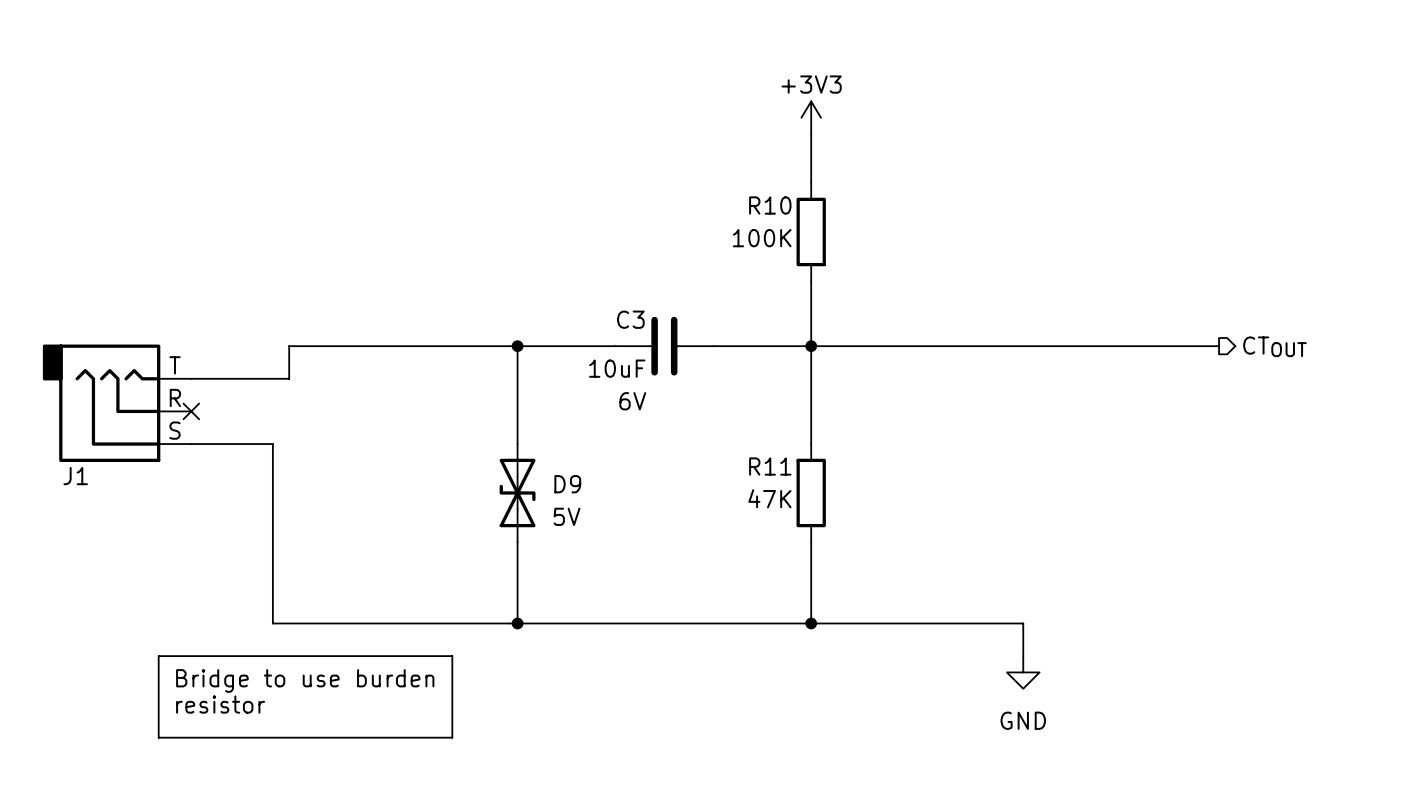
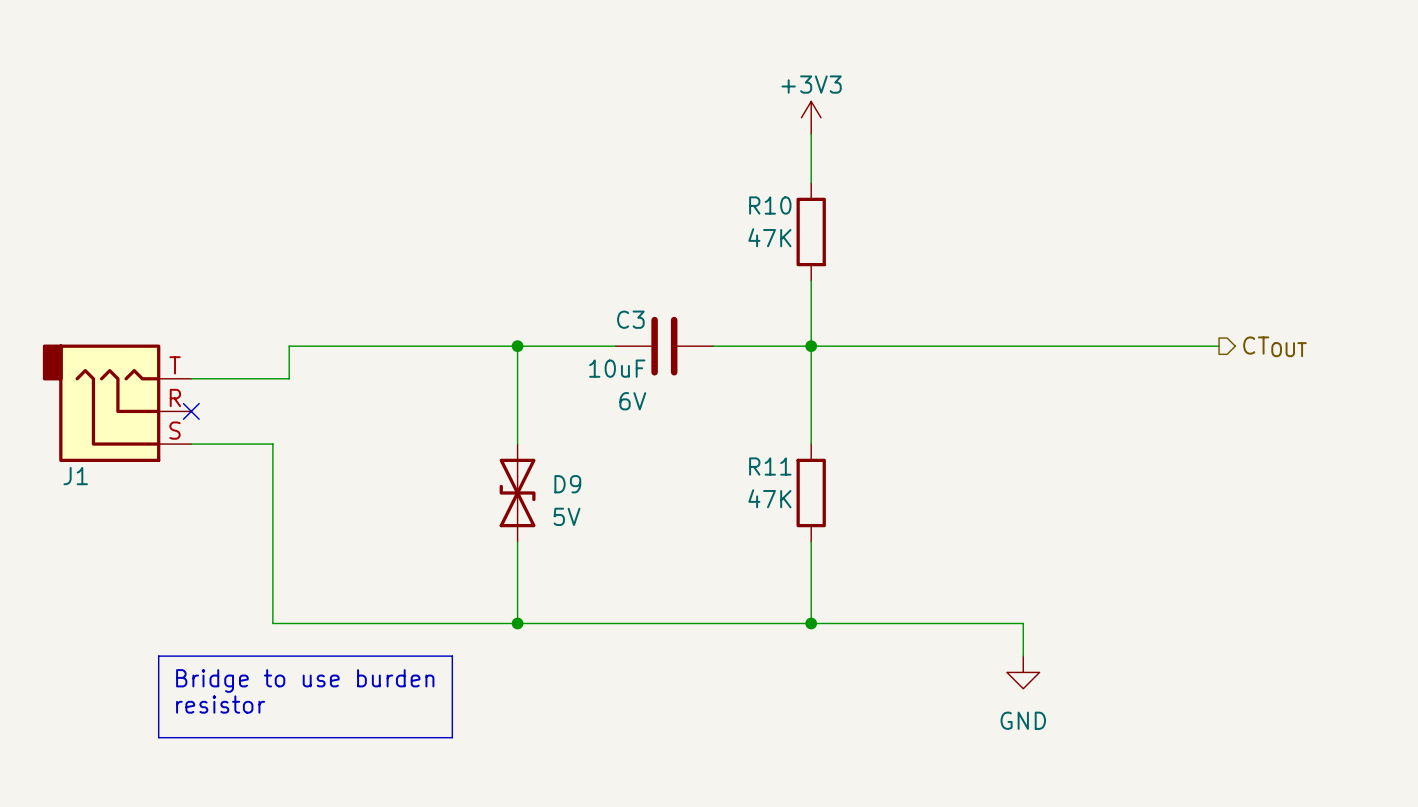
R10 value: 100K (762, 238) -> 47K (769, 237)

